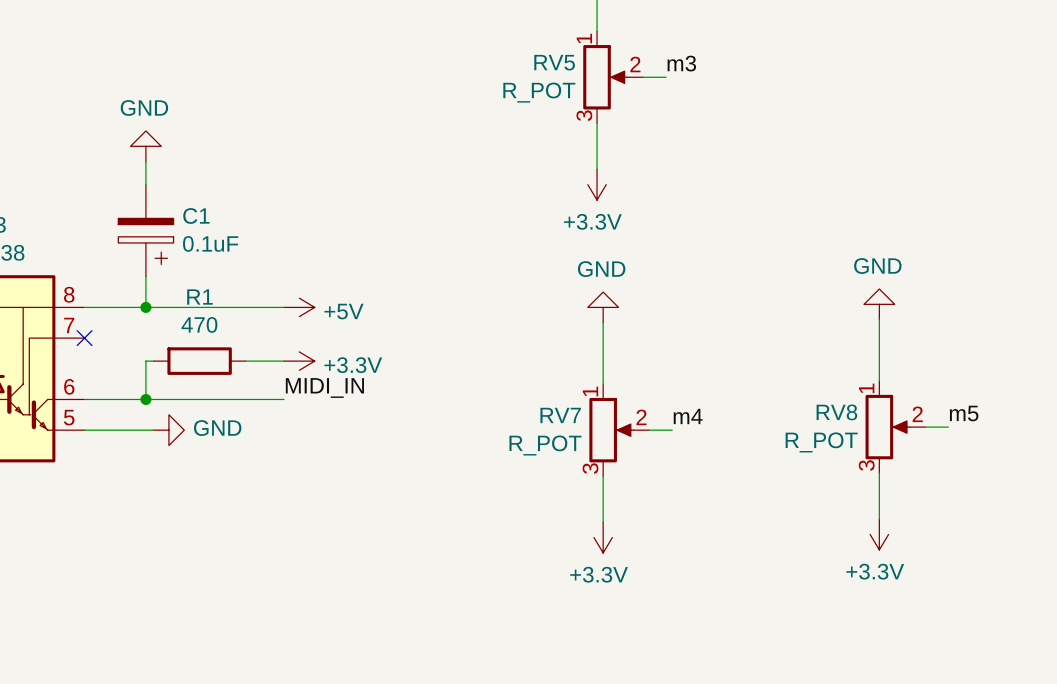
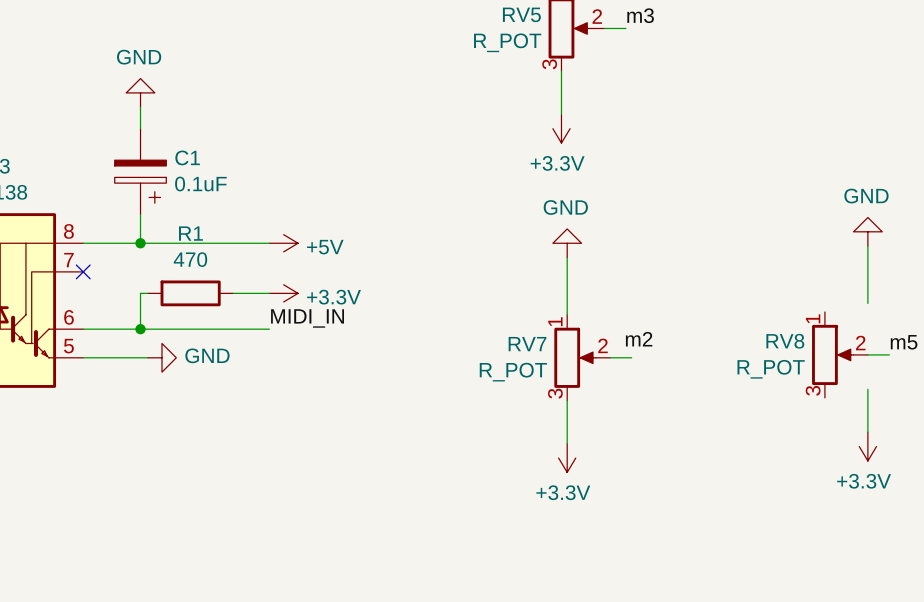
power symbol position: GND (879, 304) -> GND (867, 231)
wire: (879, 319) (879, 381) -> (867, 246) (867, 303)
label: m4 (688, 416) -> m2 (639, 339)
wire: (879, 473) (879, 519) -> (867, 389) (867, 432)
power symbol position: +3.3V (879, 534) -> +3.3V (867, 446)

